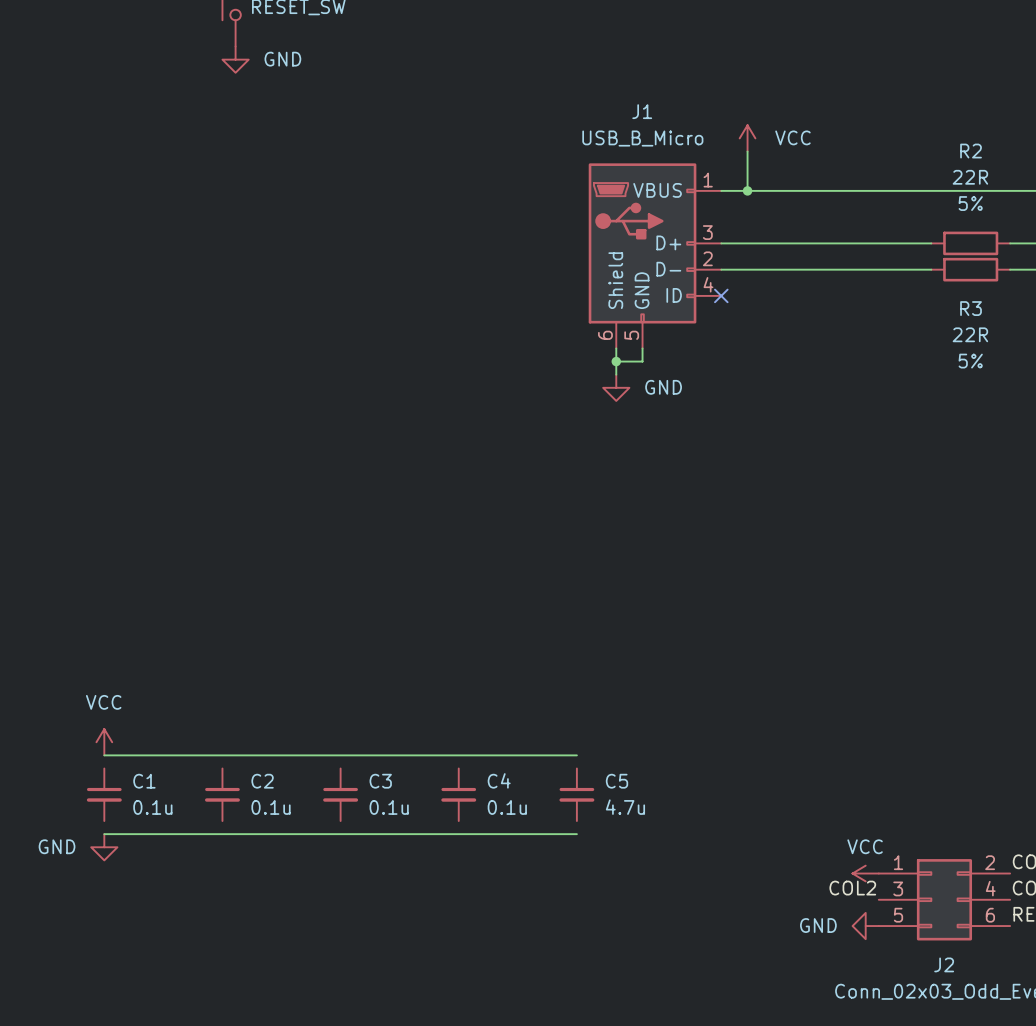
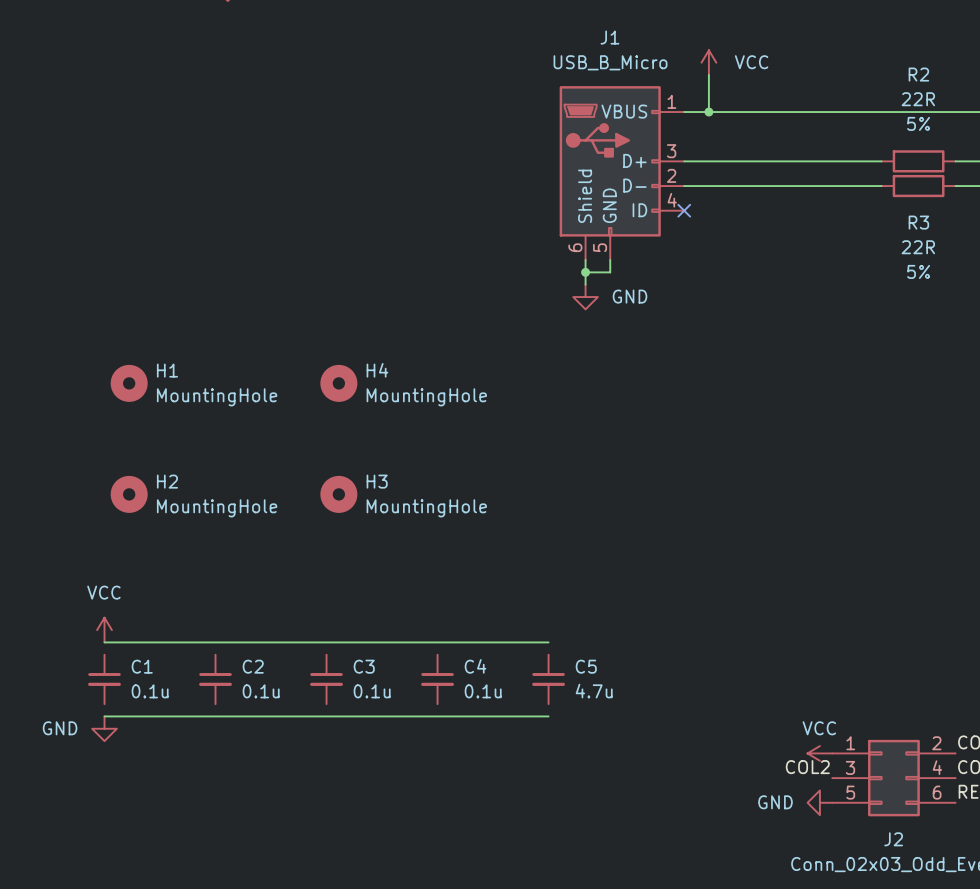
H1: none -> MountingHole (129, 383)
H4: none -> MountingHole (338, 383)
H2: none -> MountingHole (129, 494)
H3: none -> MountingHole (338, 494)

